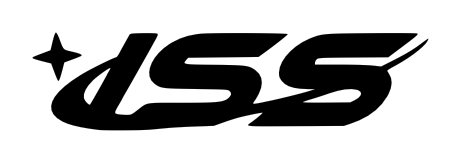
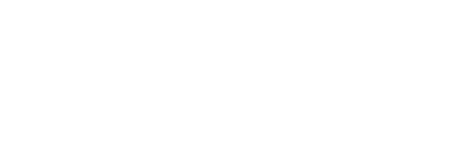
drawing: [32, 32, 429, 131] -> none

